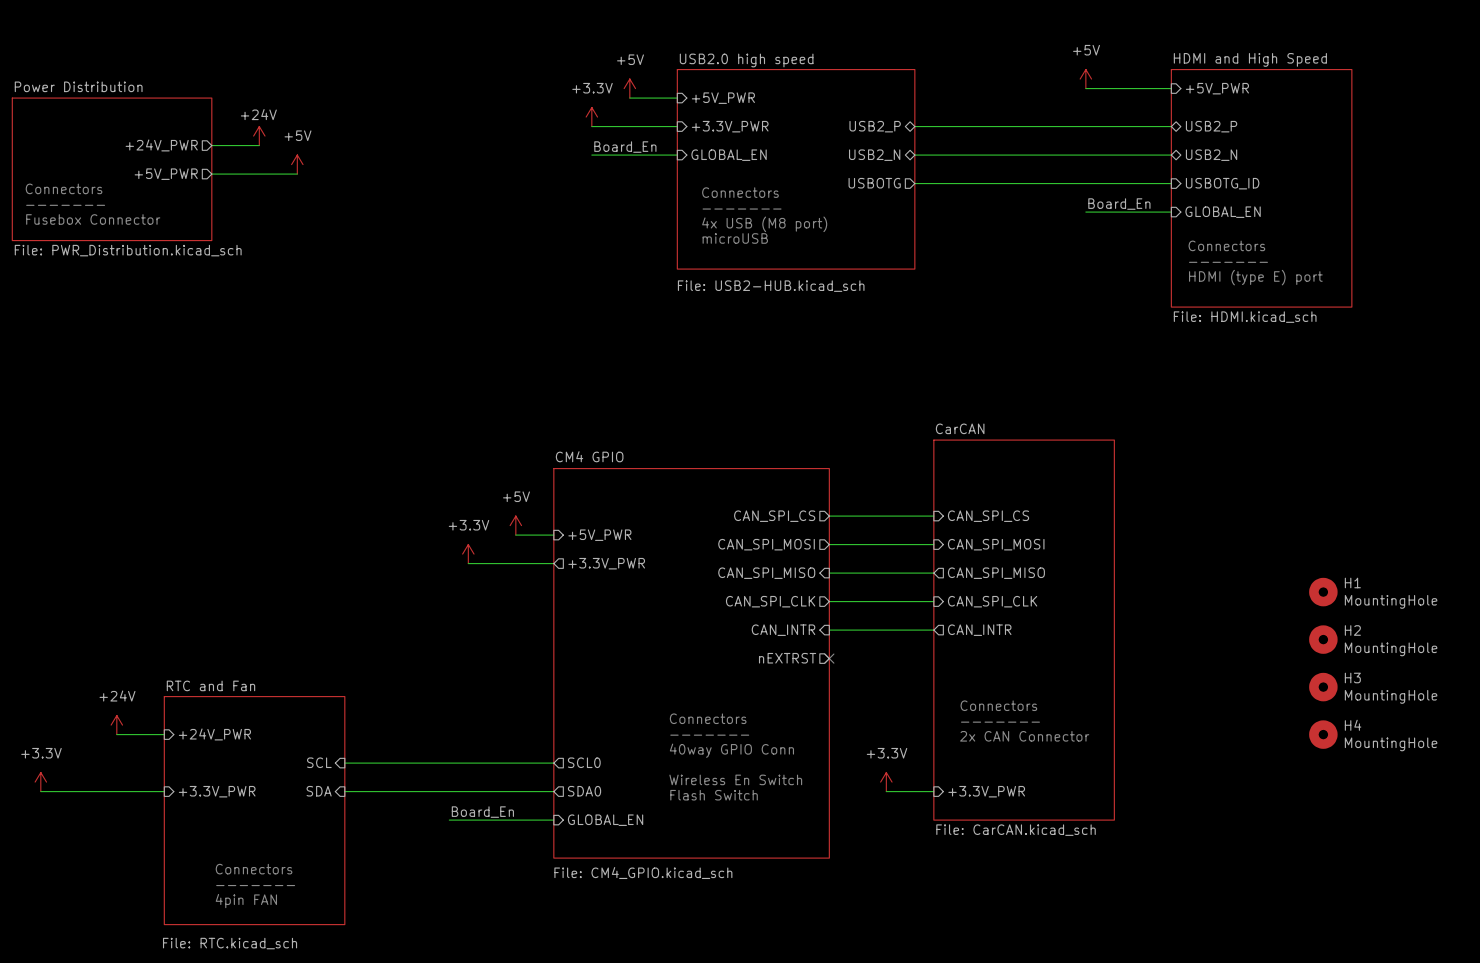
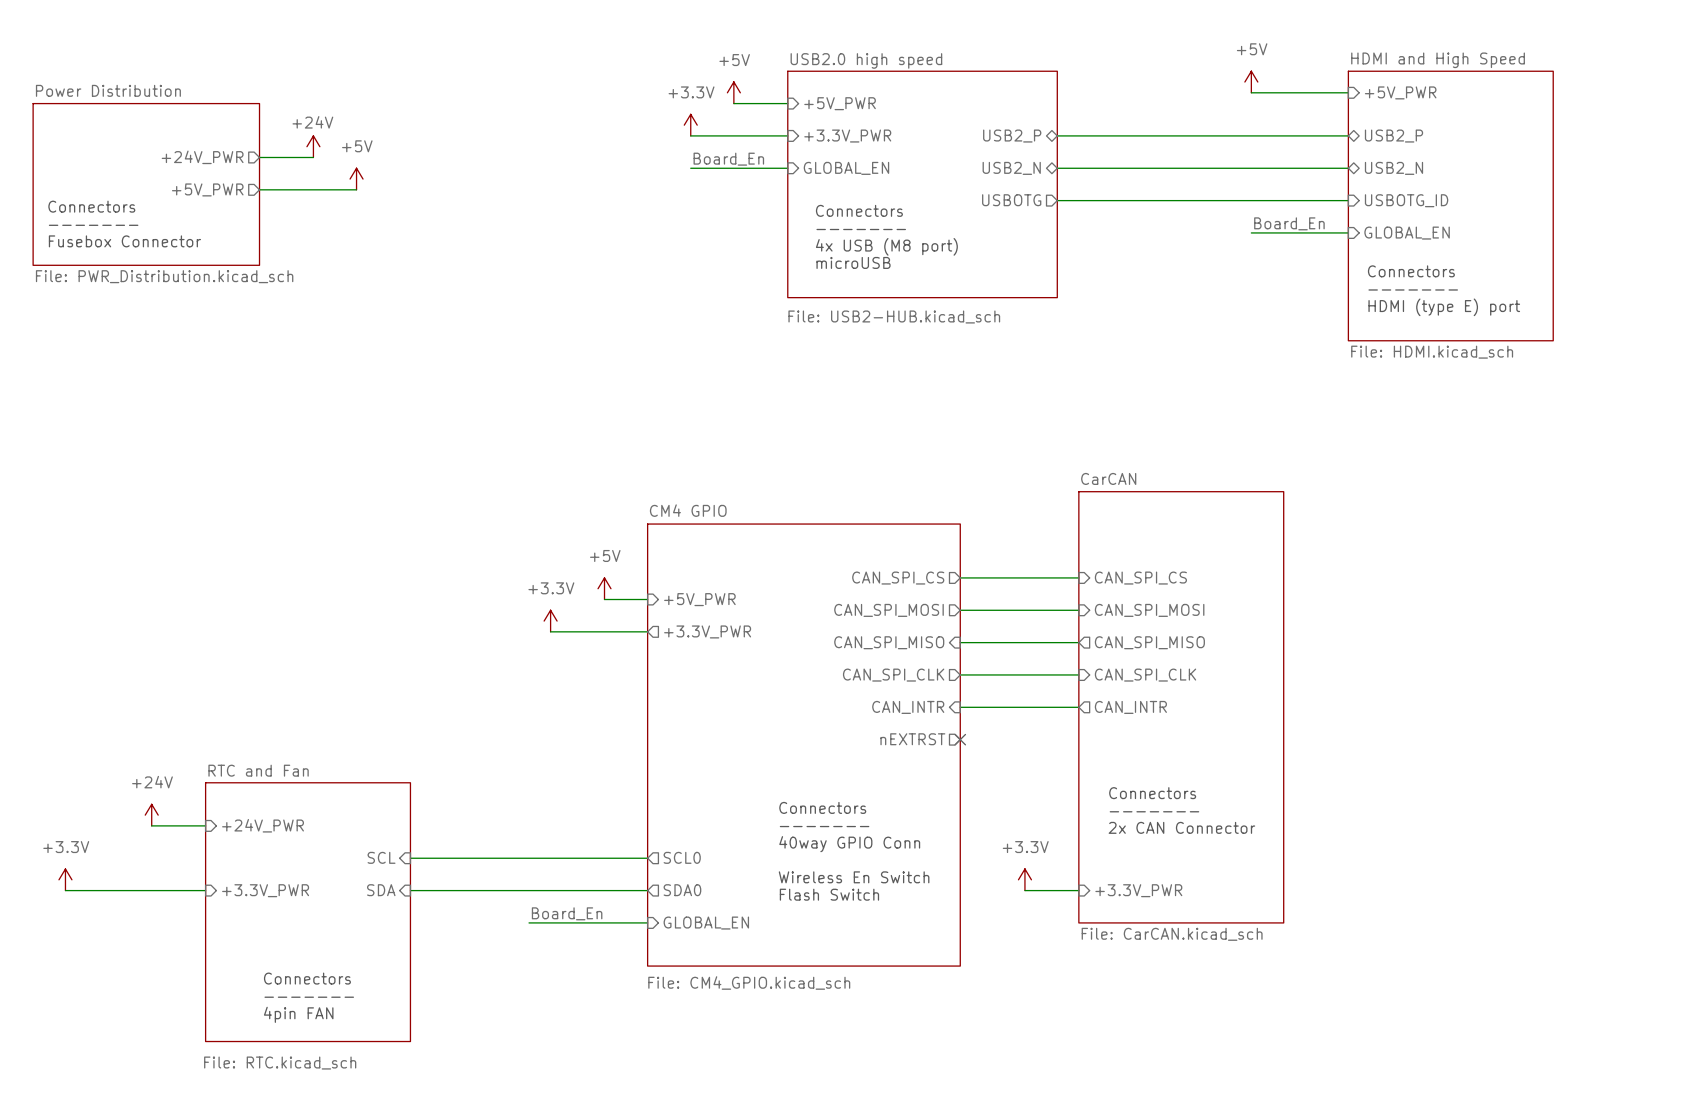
H1: MountingHole (1323, 592) -> none
H2: MountingHole (1323, 639) -> none
H3: MountingHole (1323, 687) -> none
H4: MountingHole (1323, 734) -> none

